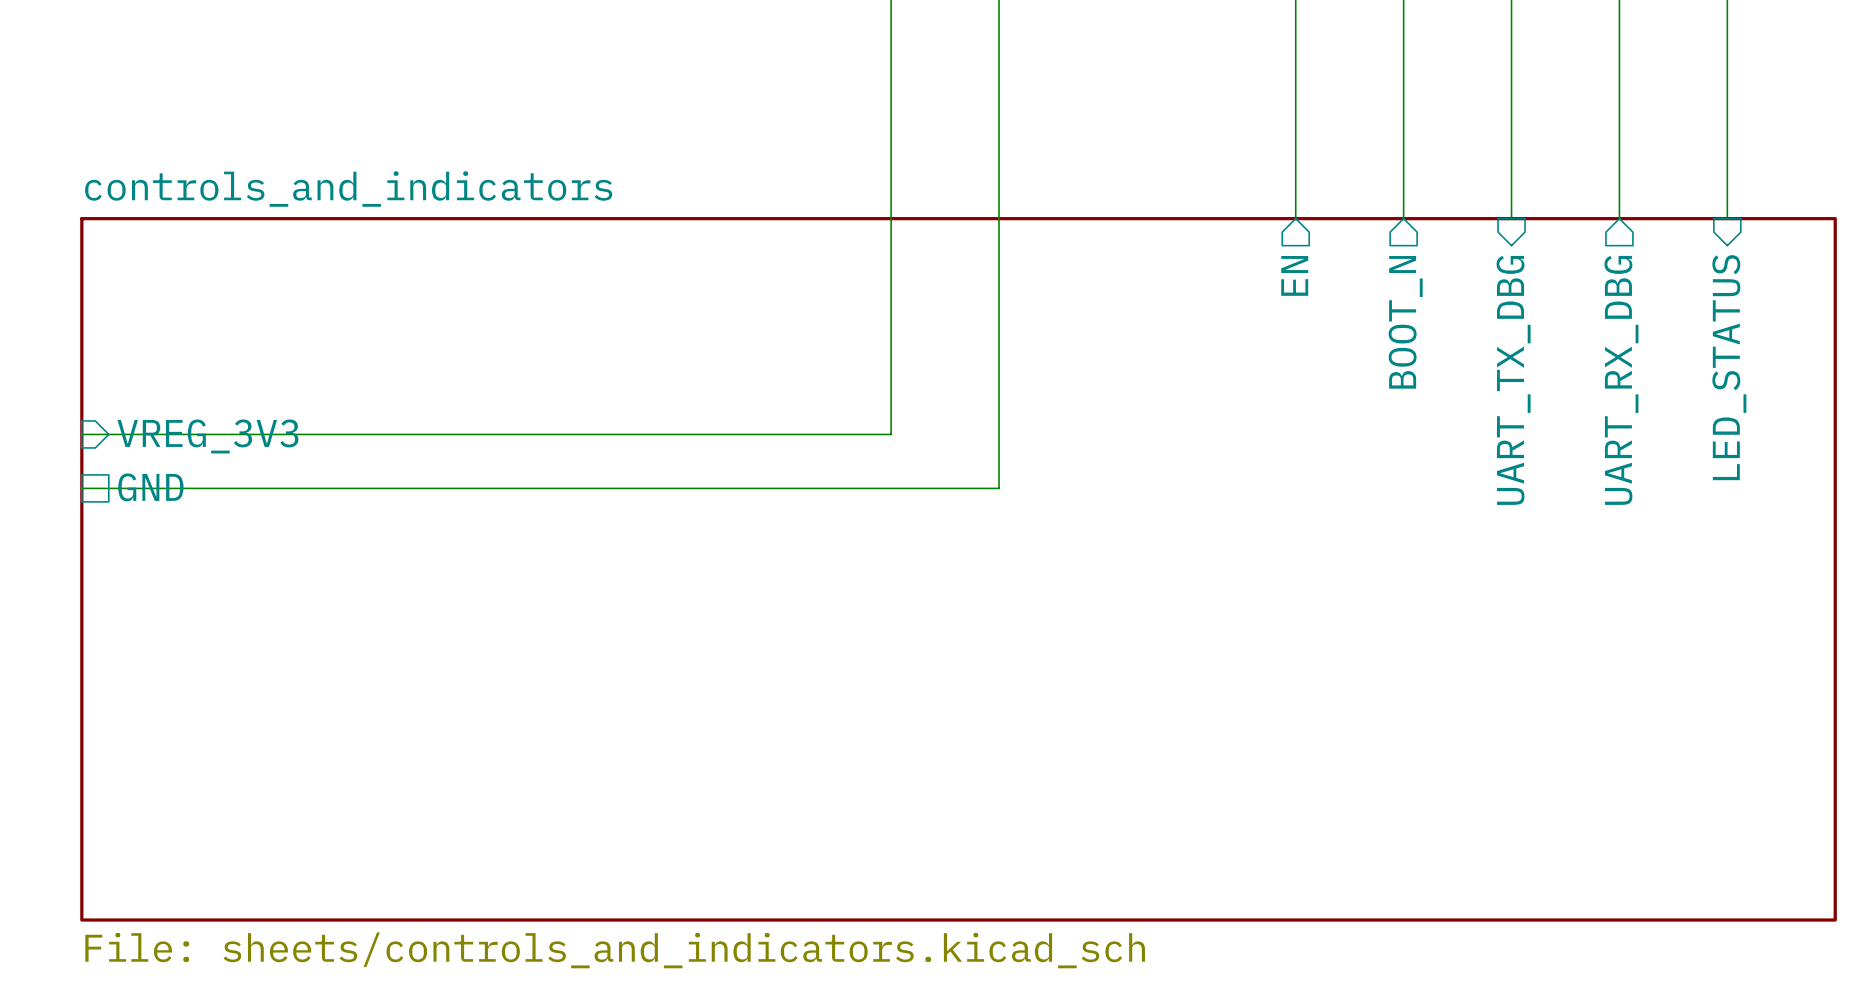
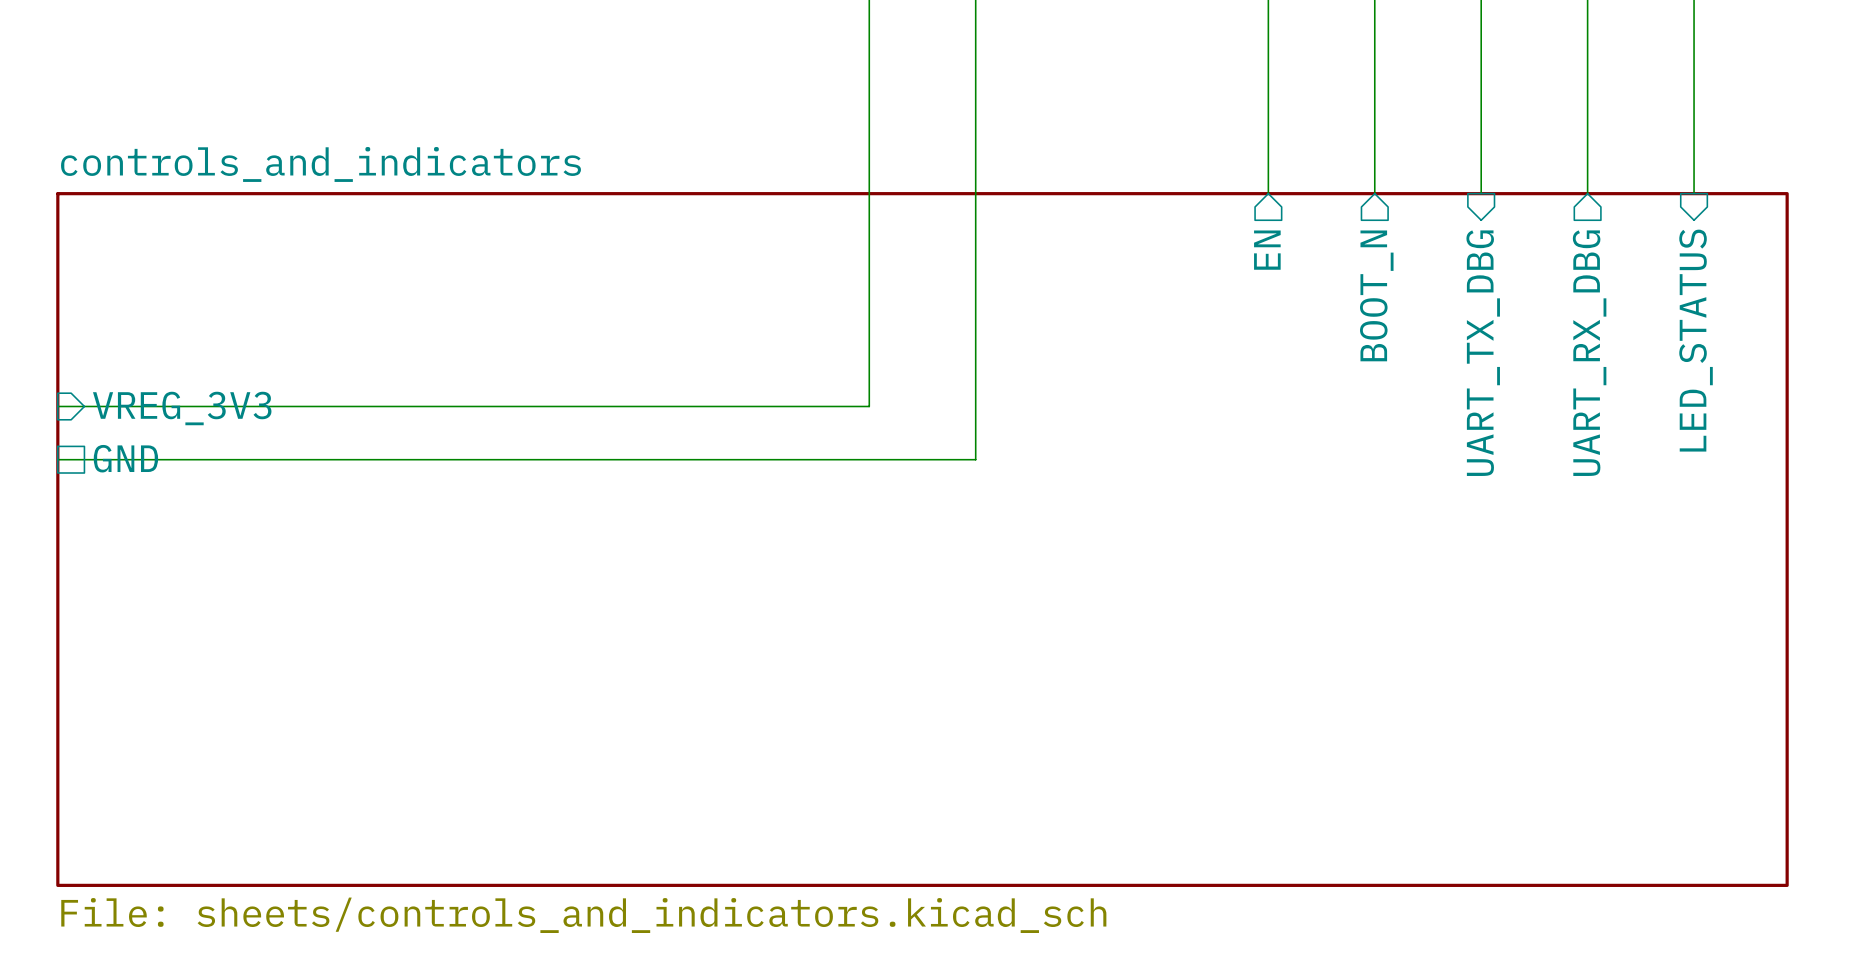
wire: none -> (57, 406) (71, 406)
sheet pin position: VREG_3V3 (207, 436) -> VREG_3V3 (182, 408)
sheet pin position: GND (150, 487) -> GND (125, 458)
wire: none -> (57, 459) (71, 459)
sheet controls_and_indicators position: (958, 569) -> (922, 539)

